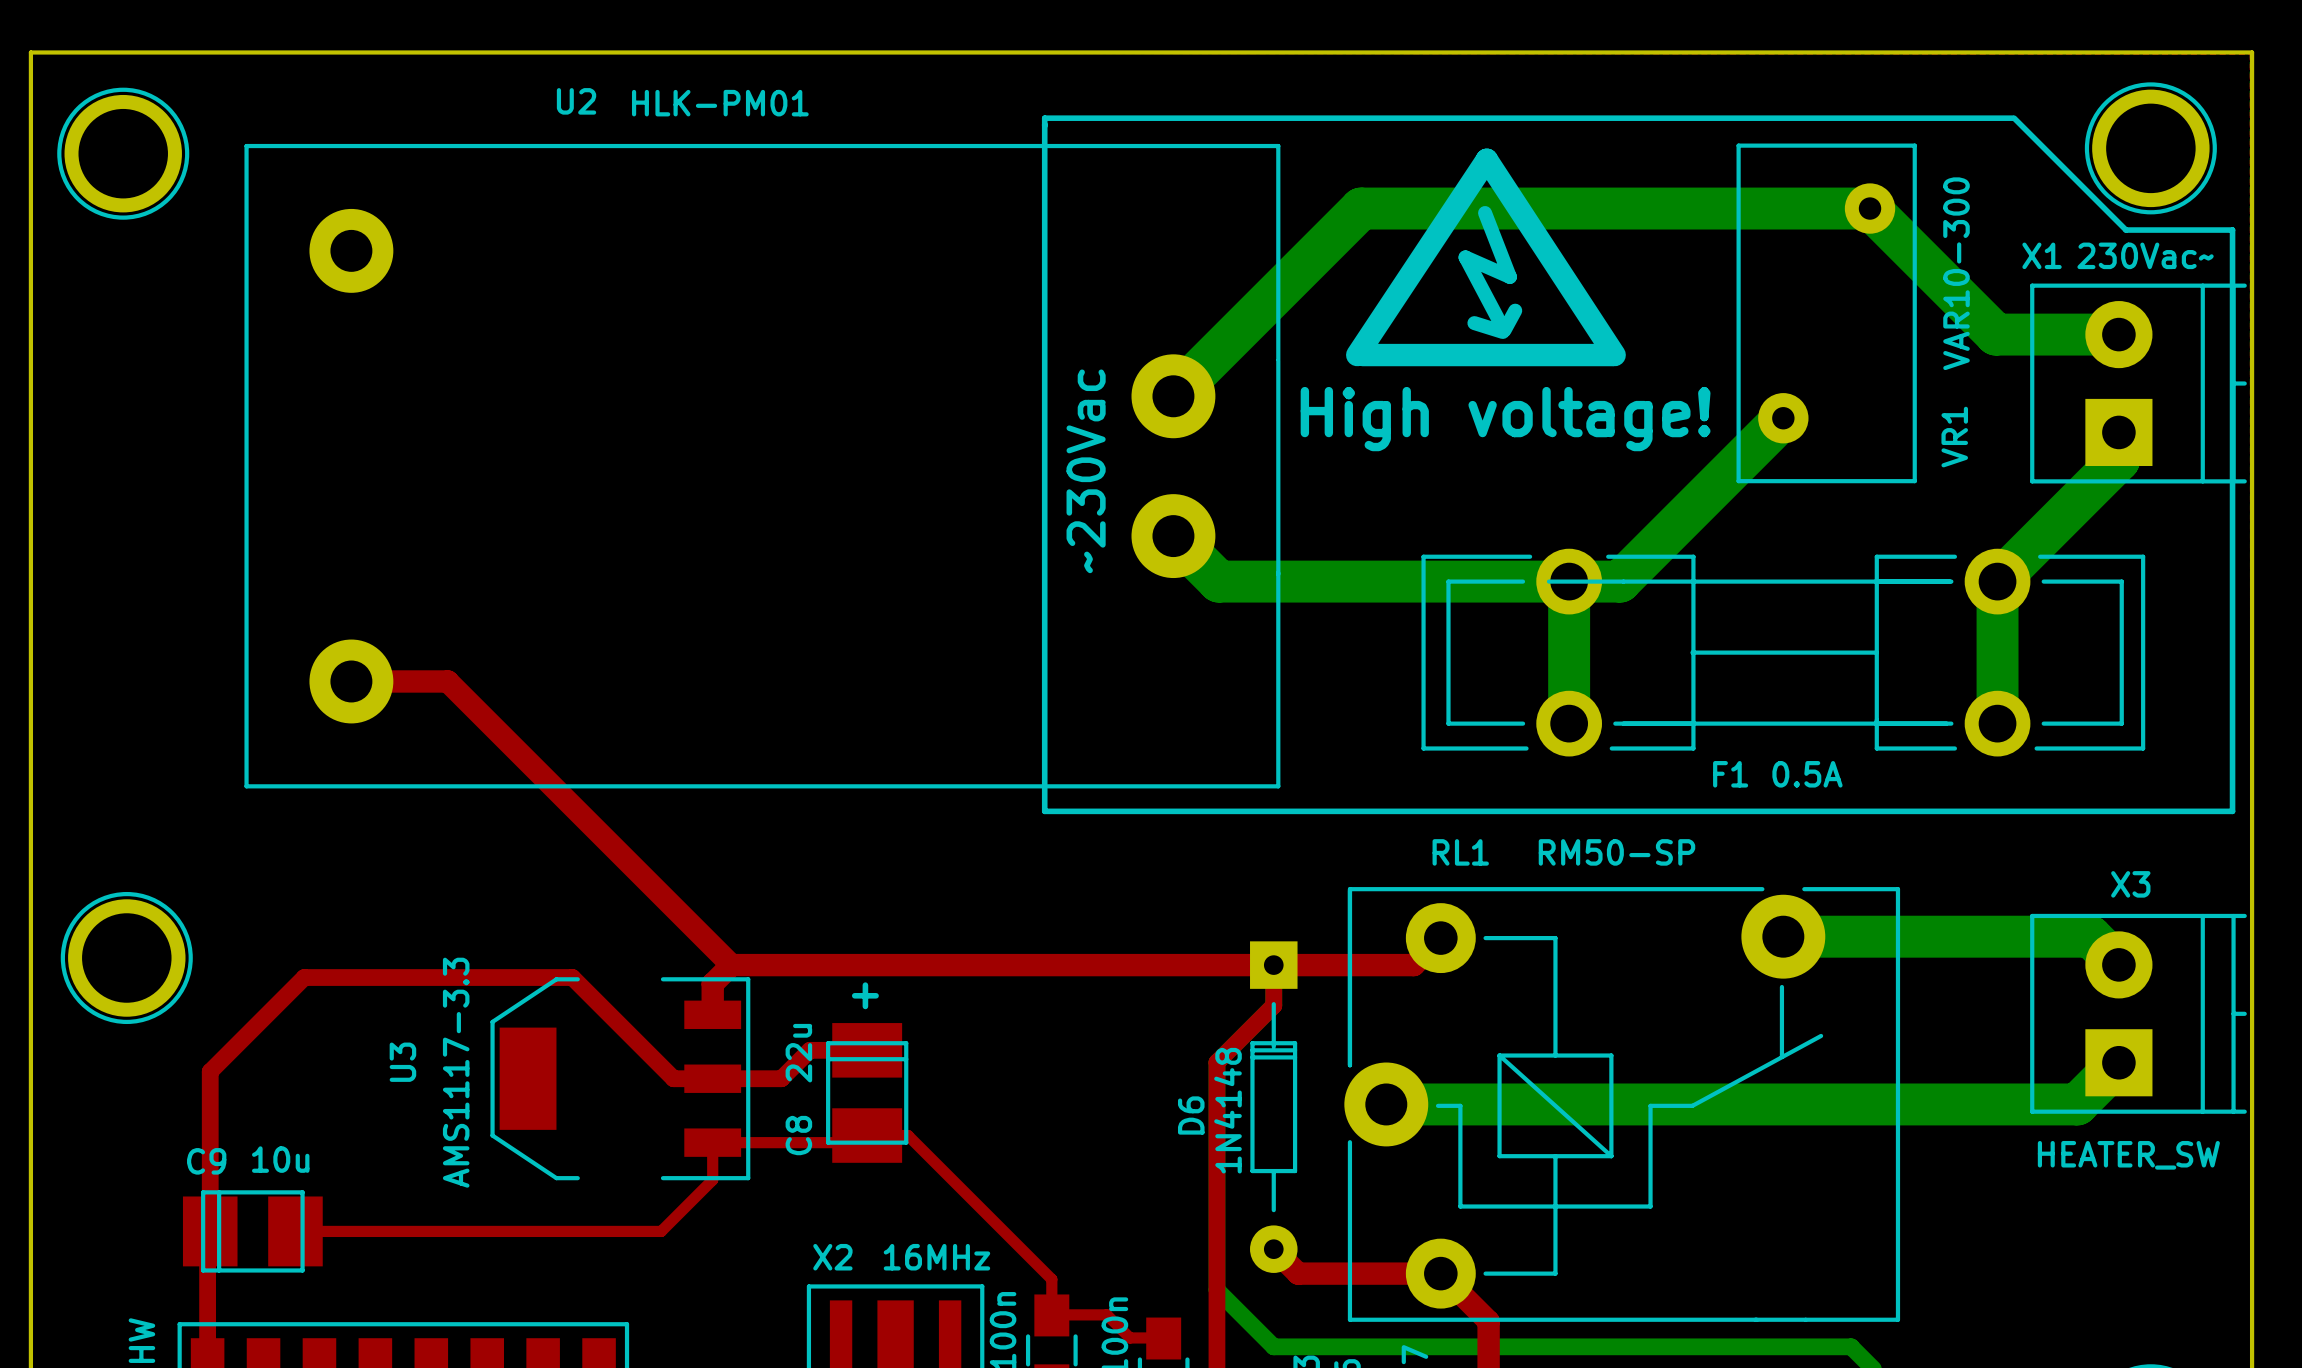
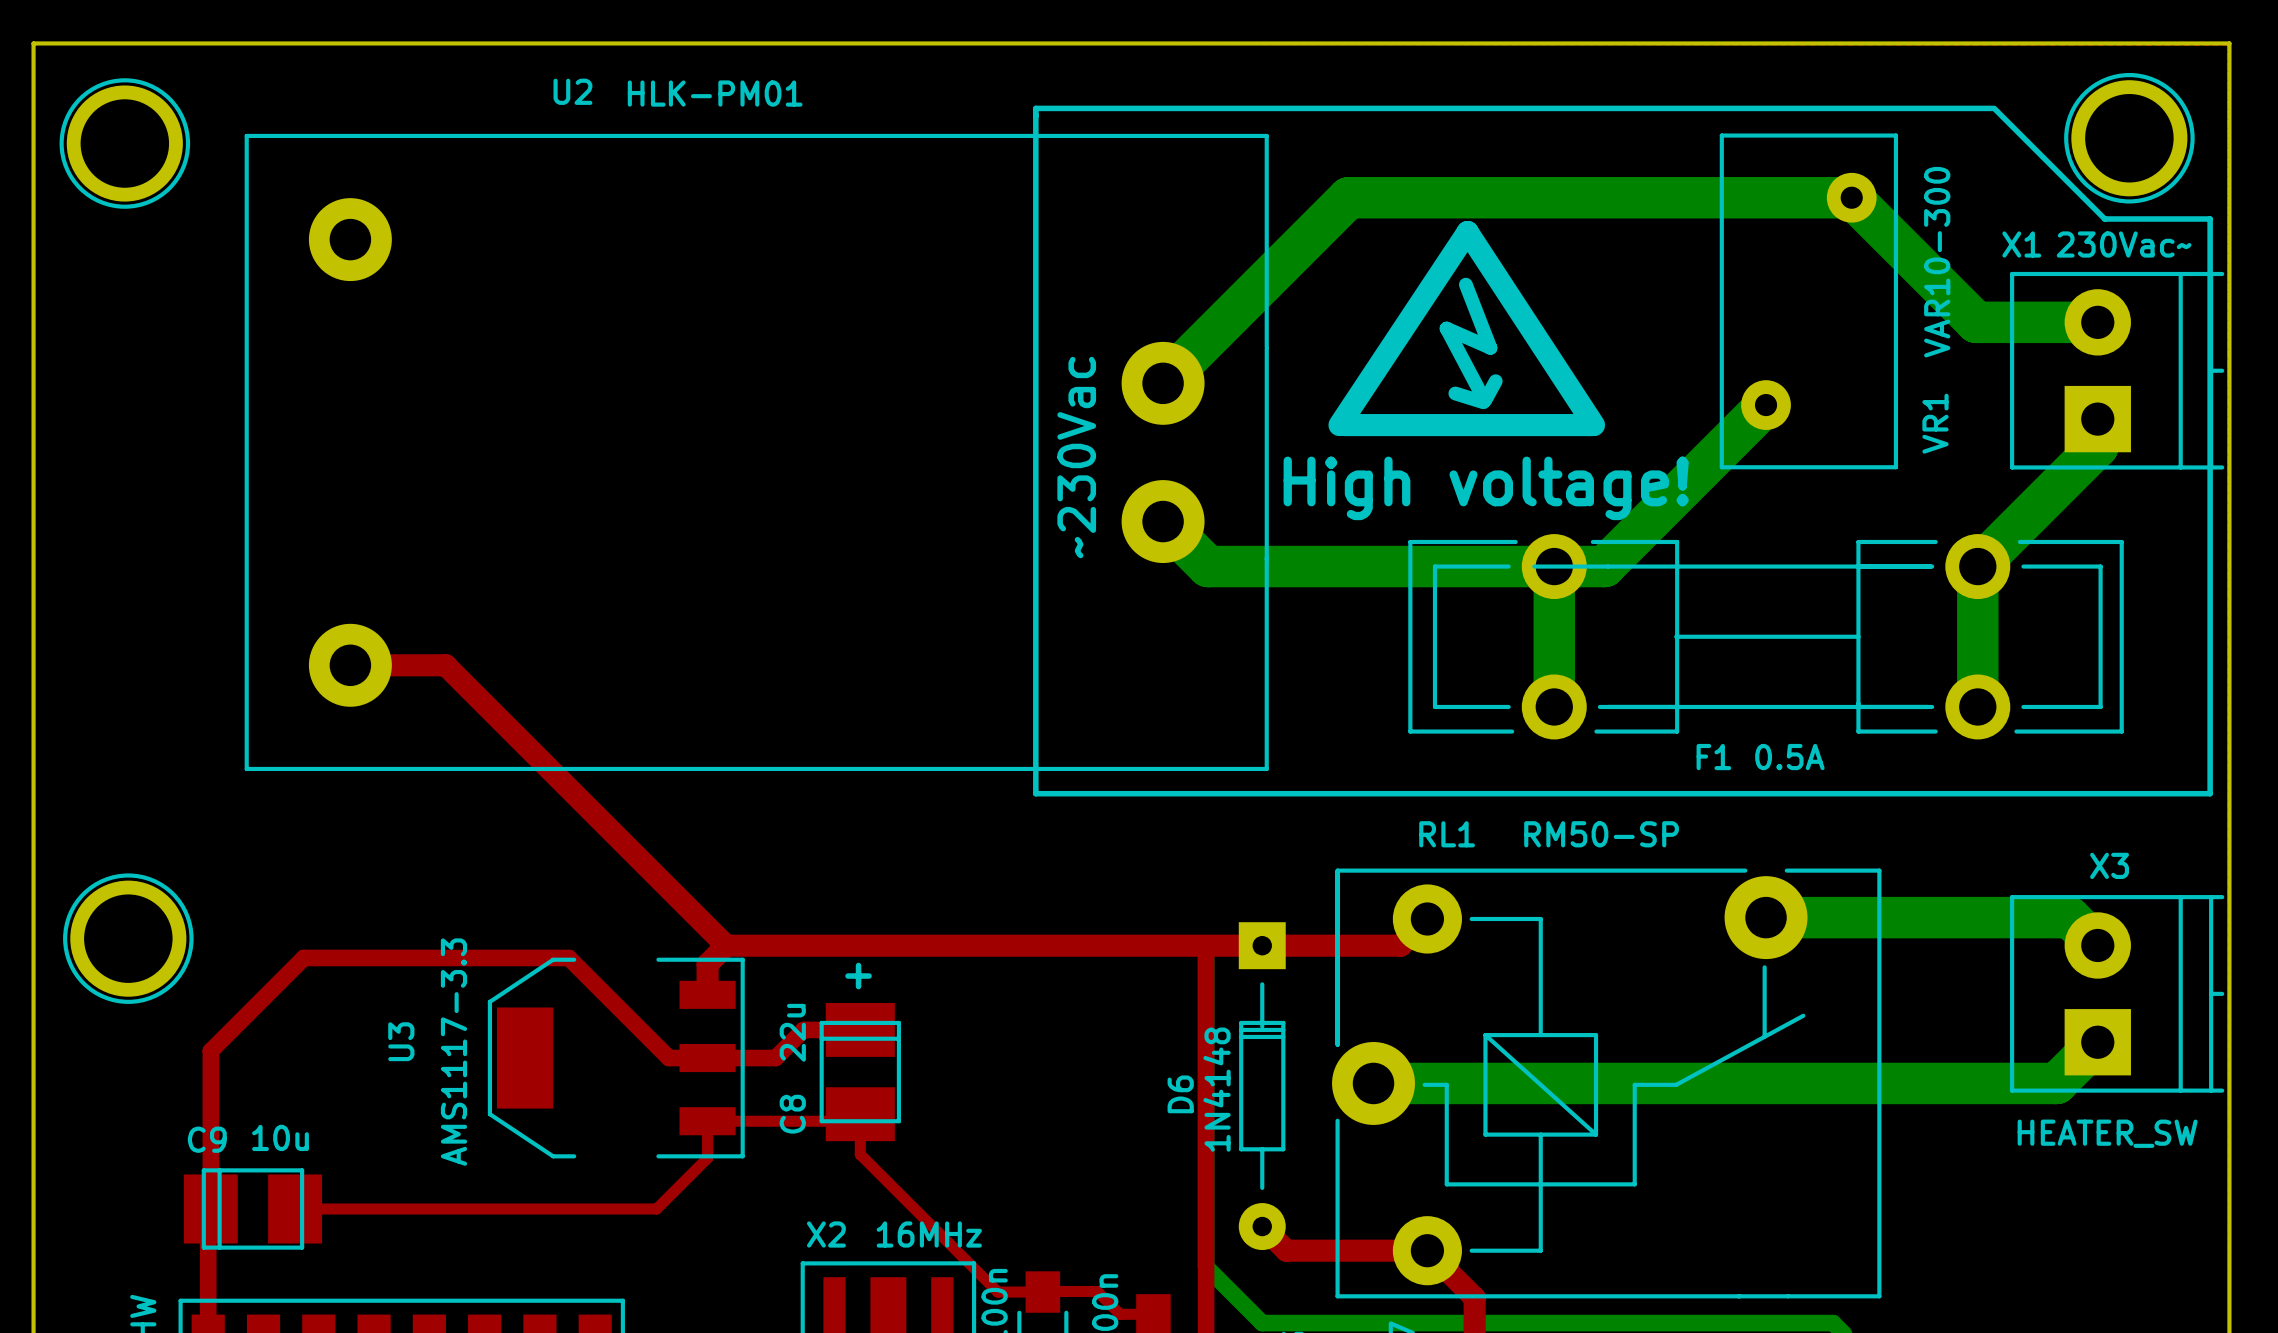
line: (1485, 213) (1509, 276) (1465, 257) (1497, 317) -> (1465, 284) (1490, 347) (1446, 328) (1478, 388)
line: (1515, 310) (1504, 330) -> (1495, 381) (1485, 400)
line: (1474, 323) (1502, 331) -> (1455, 393) (1483, 402)
line: (1357, 355) (1486, 159) (1614, 355) -> (1339, 425) (1467, 232) (1594, 425)
line: (1362, 355) (1612, 355) -> (1344, 425) (1592, 425)
text position: High voltage! (1505, 419) -> High voltage! (1486, 488)
top track: (1273, 965) (1273, 1005) (1216, 1062) -> (1262, 945) (1206, 945) (1206, 1041)
top track: (867, 1135) (908, 1135) (1051, 1279) (1051, 1315) -> (860, 1114) (860, 1154) (997, 1292) (1042, 1292)

